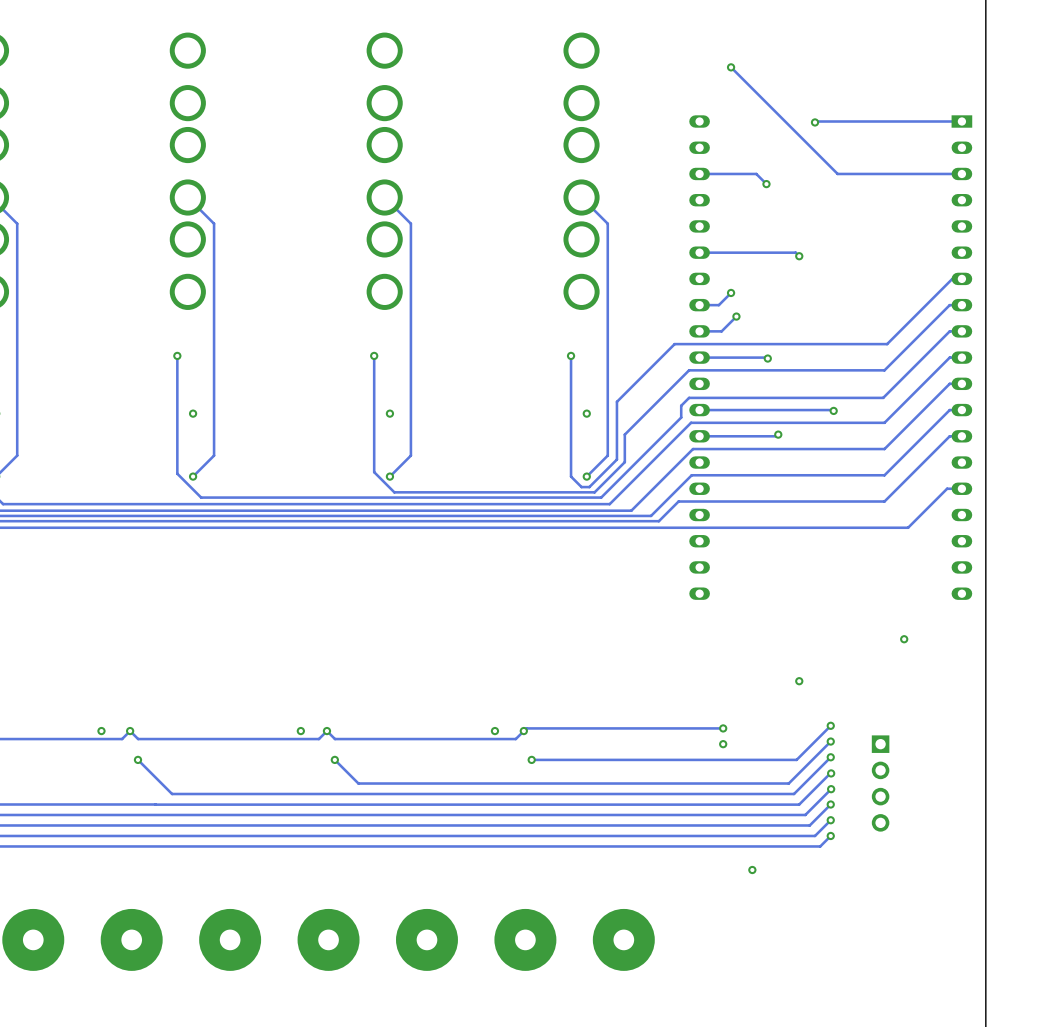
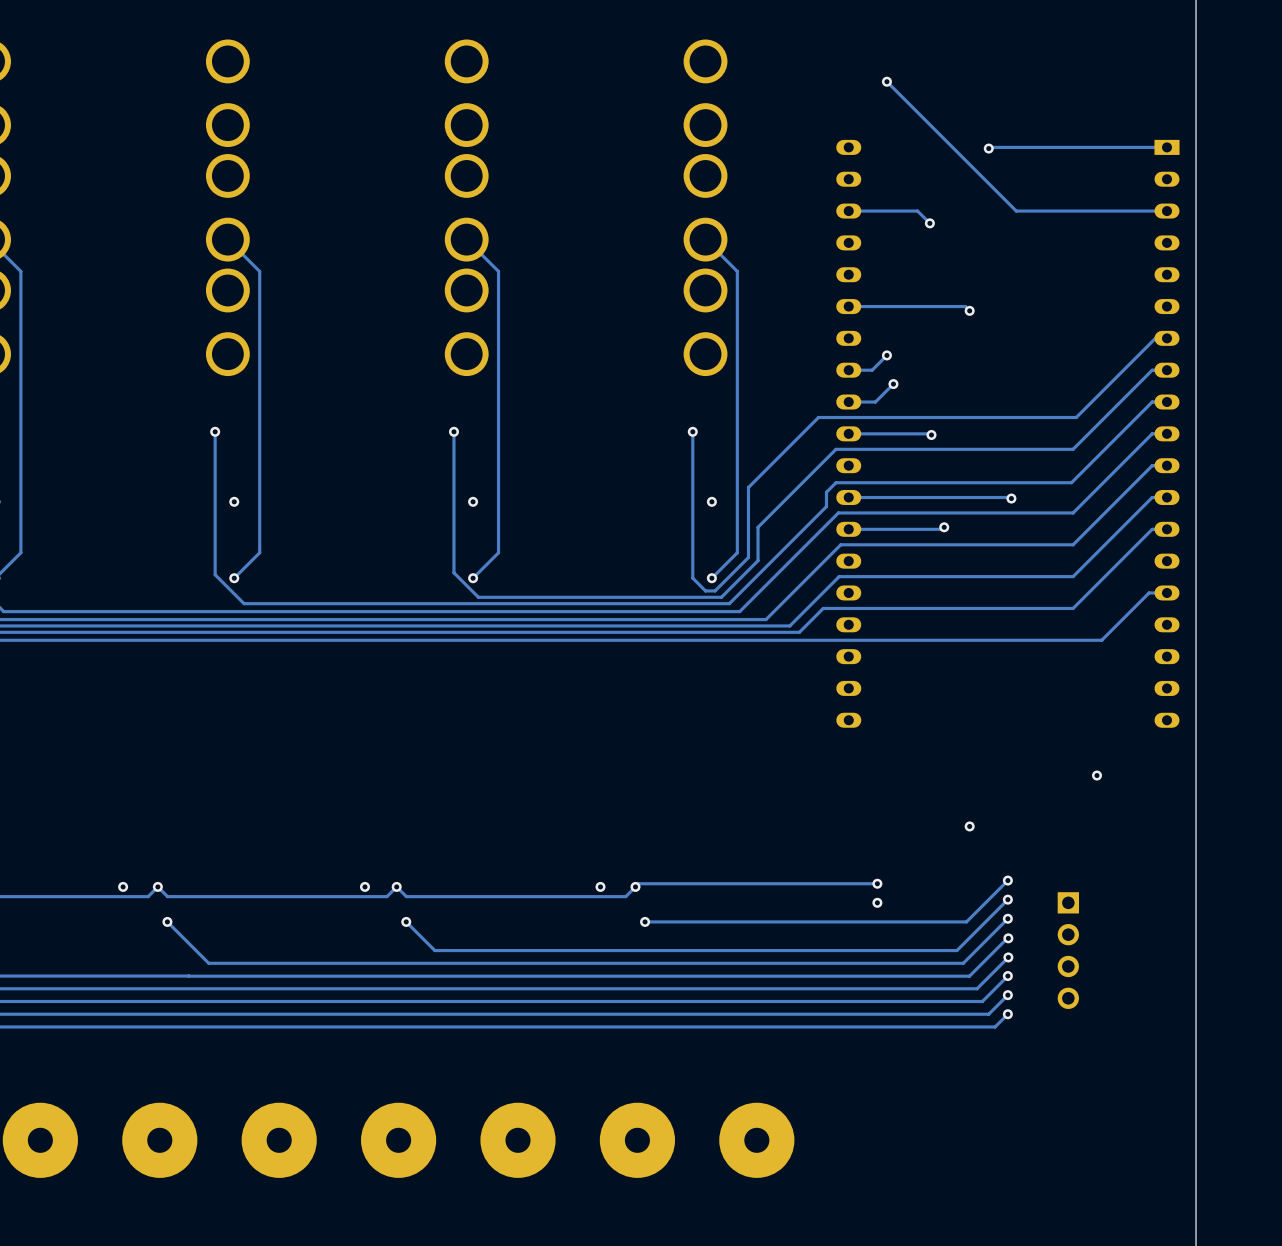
via: (752, 870) -> none

